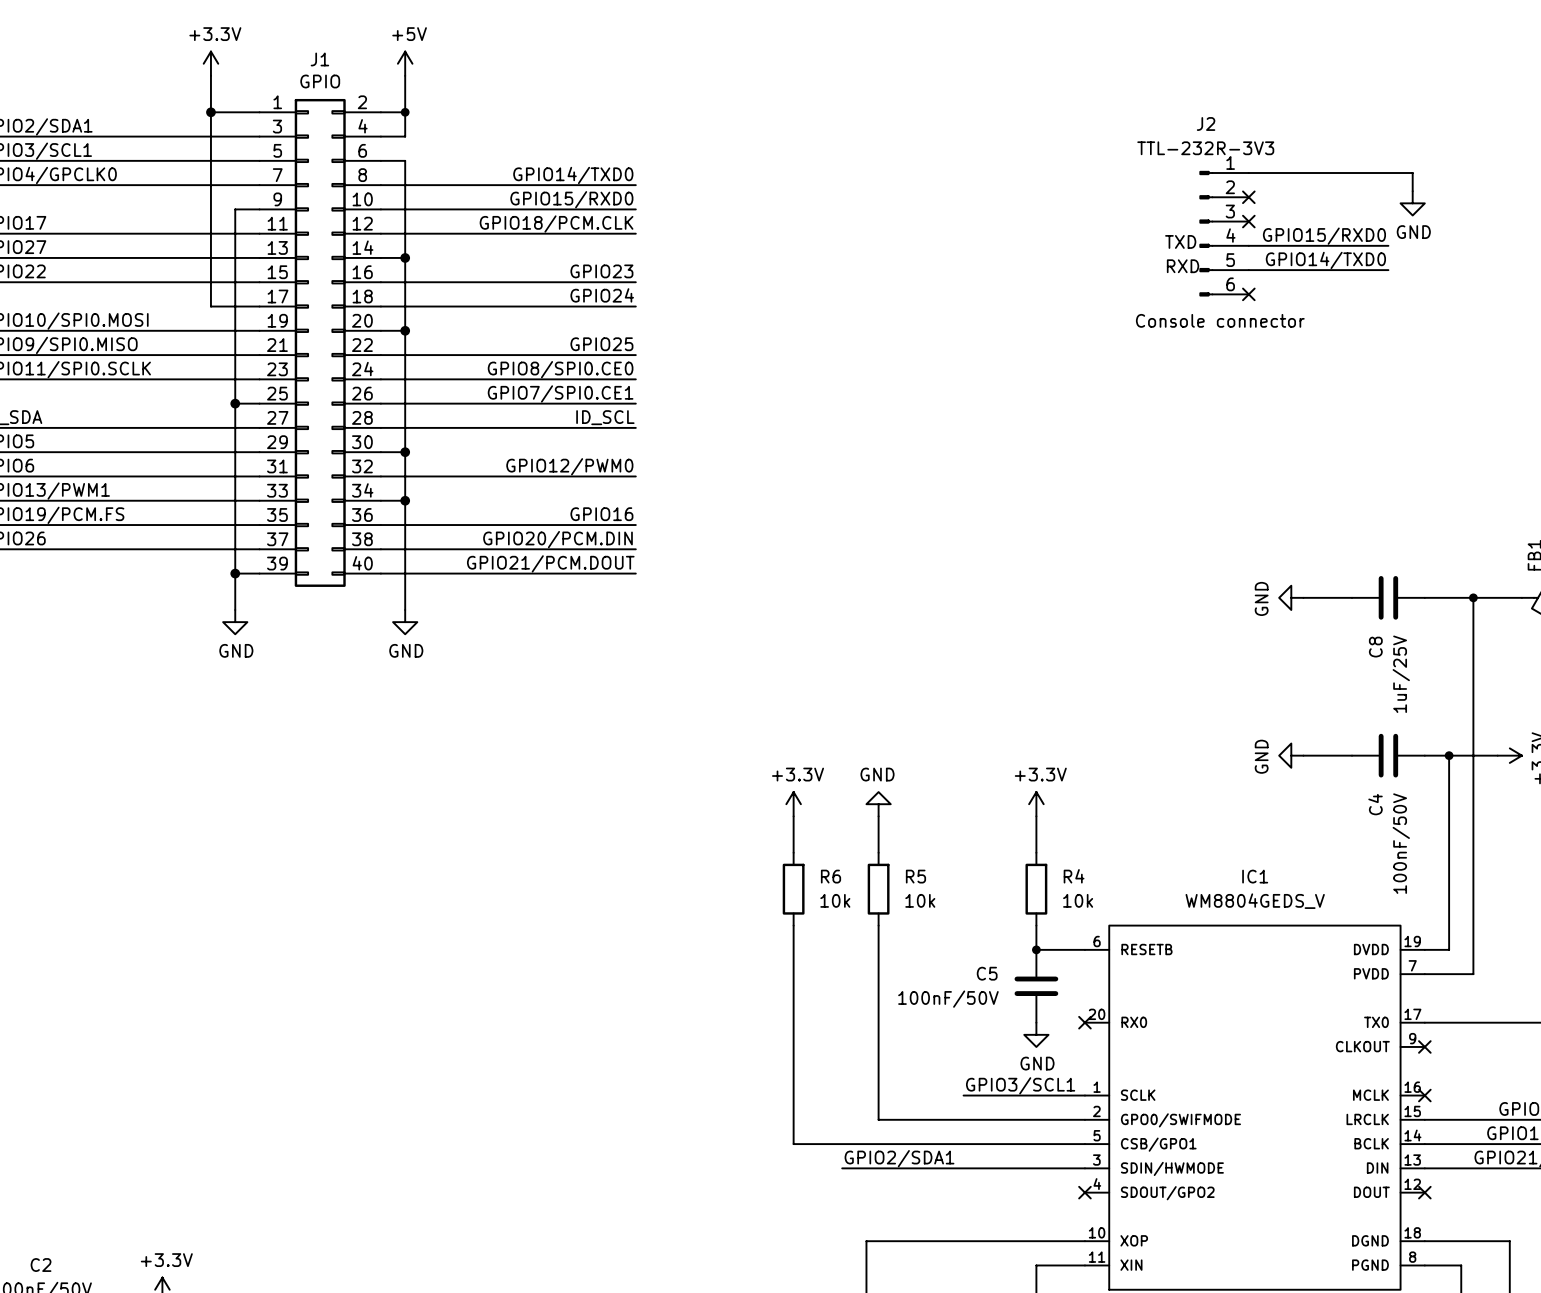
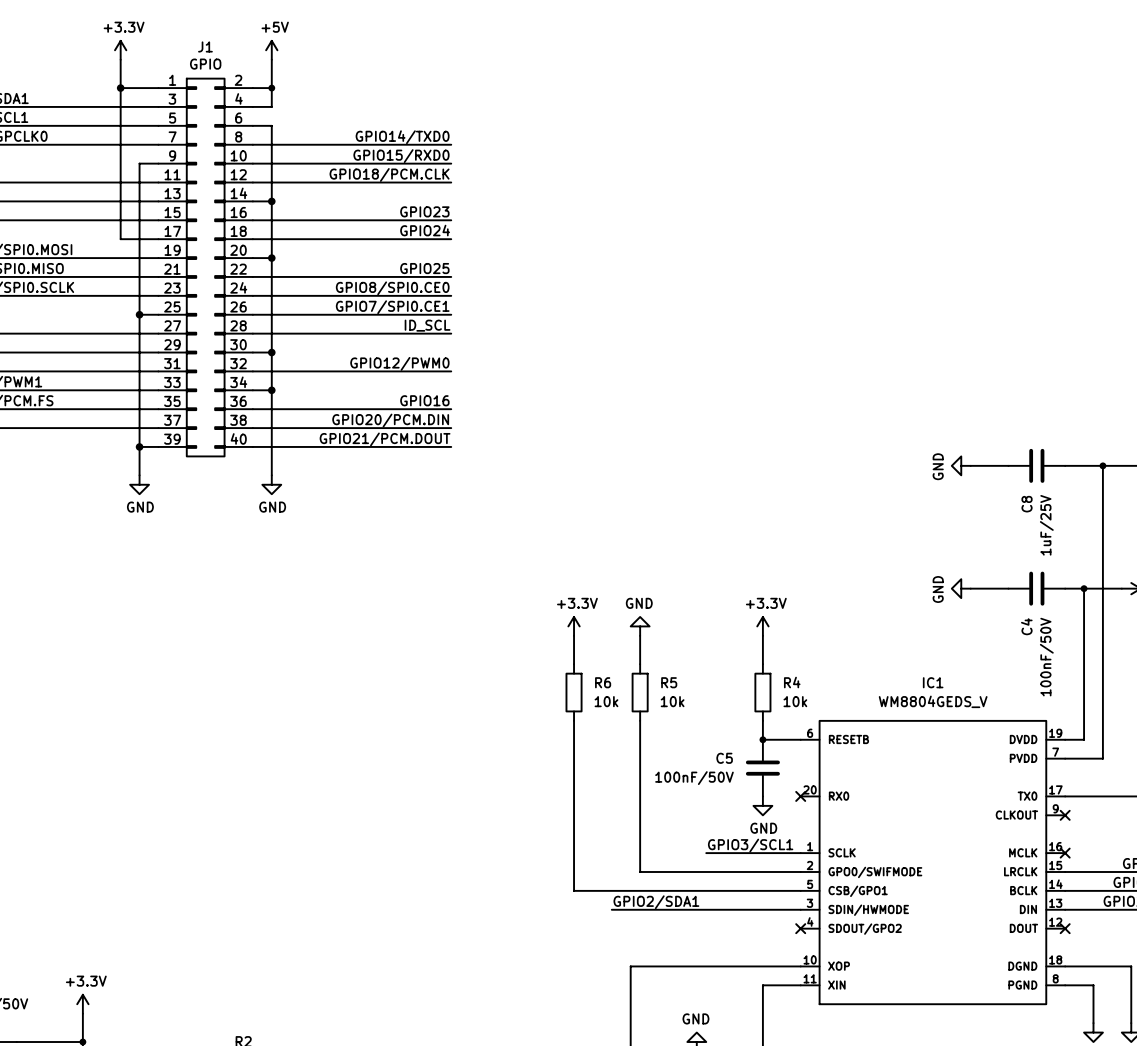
wire: (1248, 173) (1412, 173) (1412, 191) -> none
no-connect mark: (1248, 197) -> none
power symbol: GND (1412, 203) -> none
no-connect mark: (1248, 221) -> none
J2: TTL-232R-3V3 (1224, 233) -> none
label: GPIO15/RXD0 (1324, 236) -> none
text: TXD (1180, 241) -> none
wire: (1248, 245) (1388, 245) -> none
label: GPIO14/TXD0 (1325, 260) -> none
text: RXD (1183, 266) -> none
wire: (1248, 270) (1388, 270) -> none
no-connect mark: (1248, 294) -> none
text: Console connector (1220, 320) -> none

